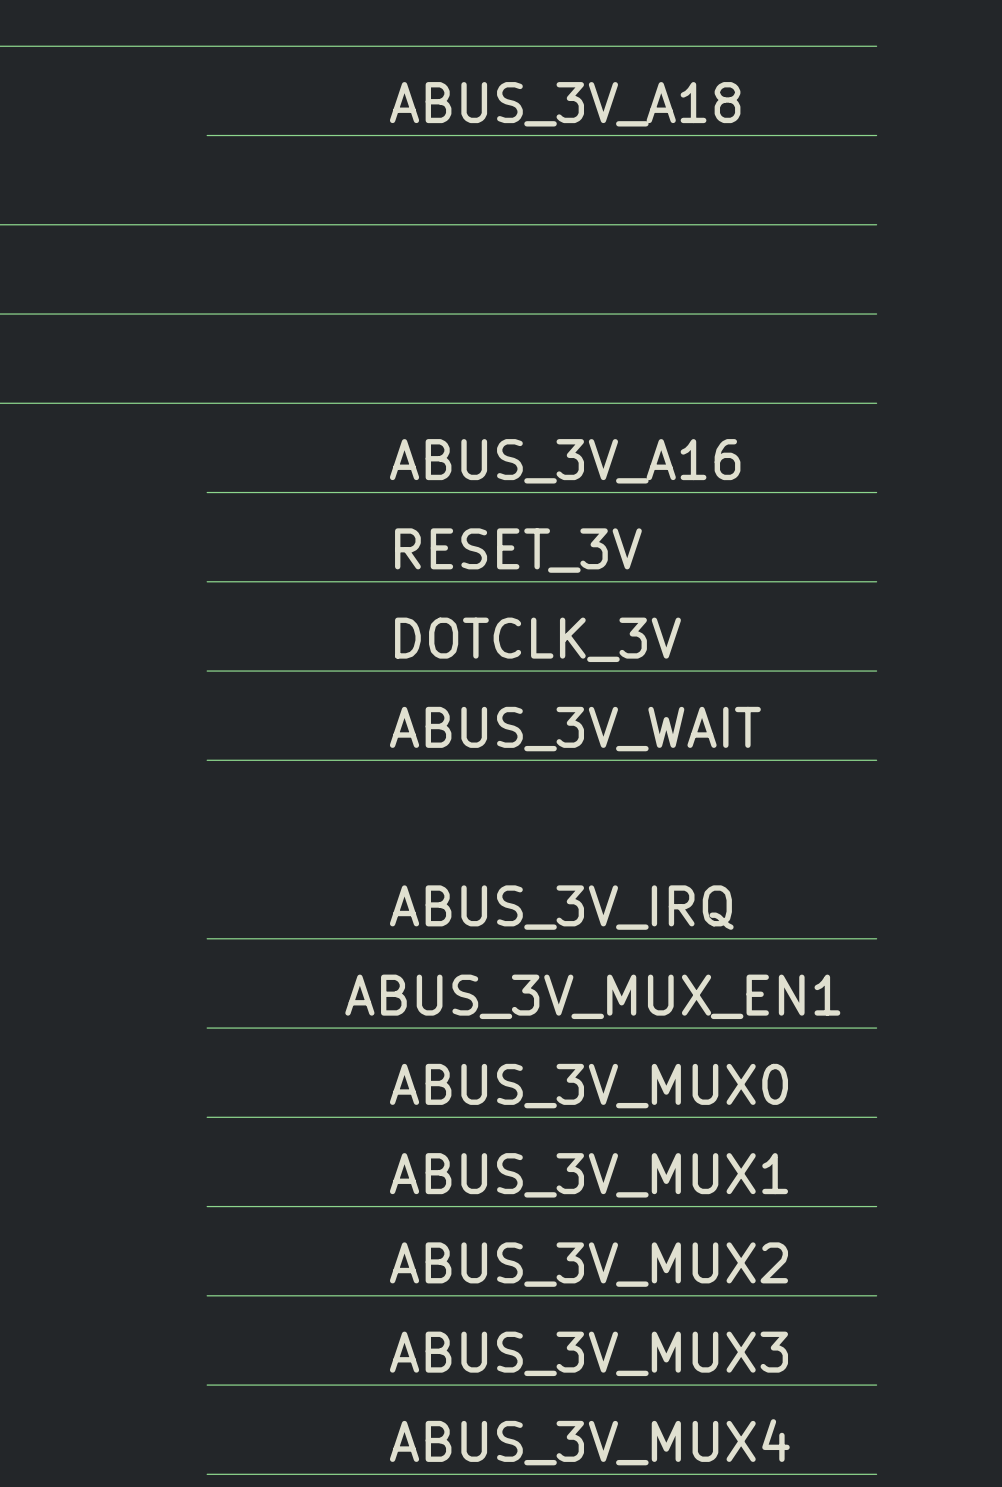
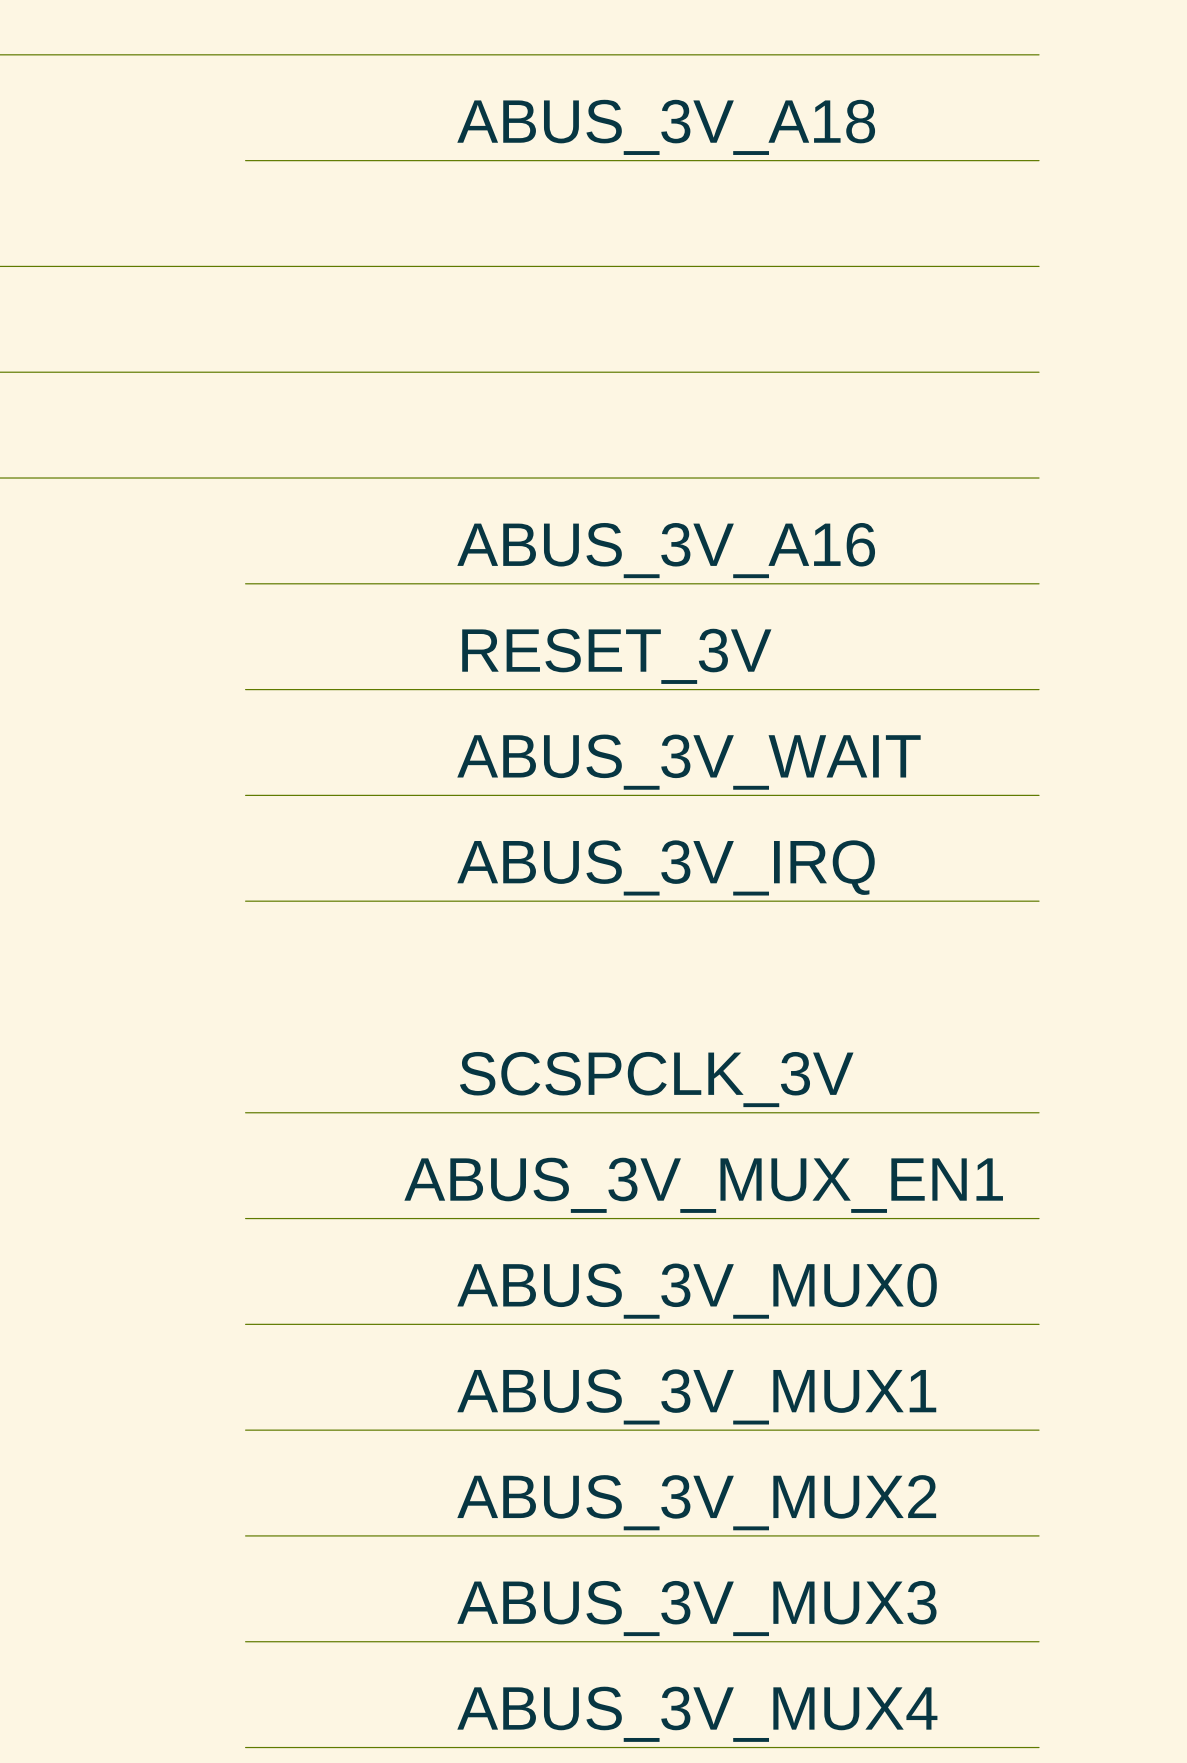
label: DOTCLK_3V (537, 639) -> ABUS_3V_WAIT (688, 762)
label: ABUS_3V_WAIT (575, 729) -> ABUS_3V_IRQ (666, 867)
label: ABUS_3V_IRQ (561, 907) -> SCSPCLK_3V (656, 1079)

